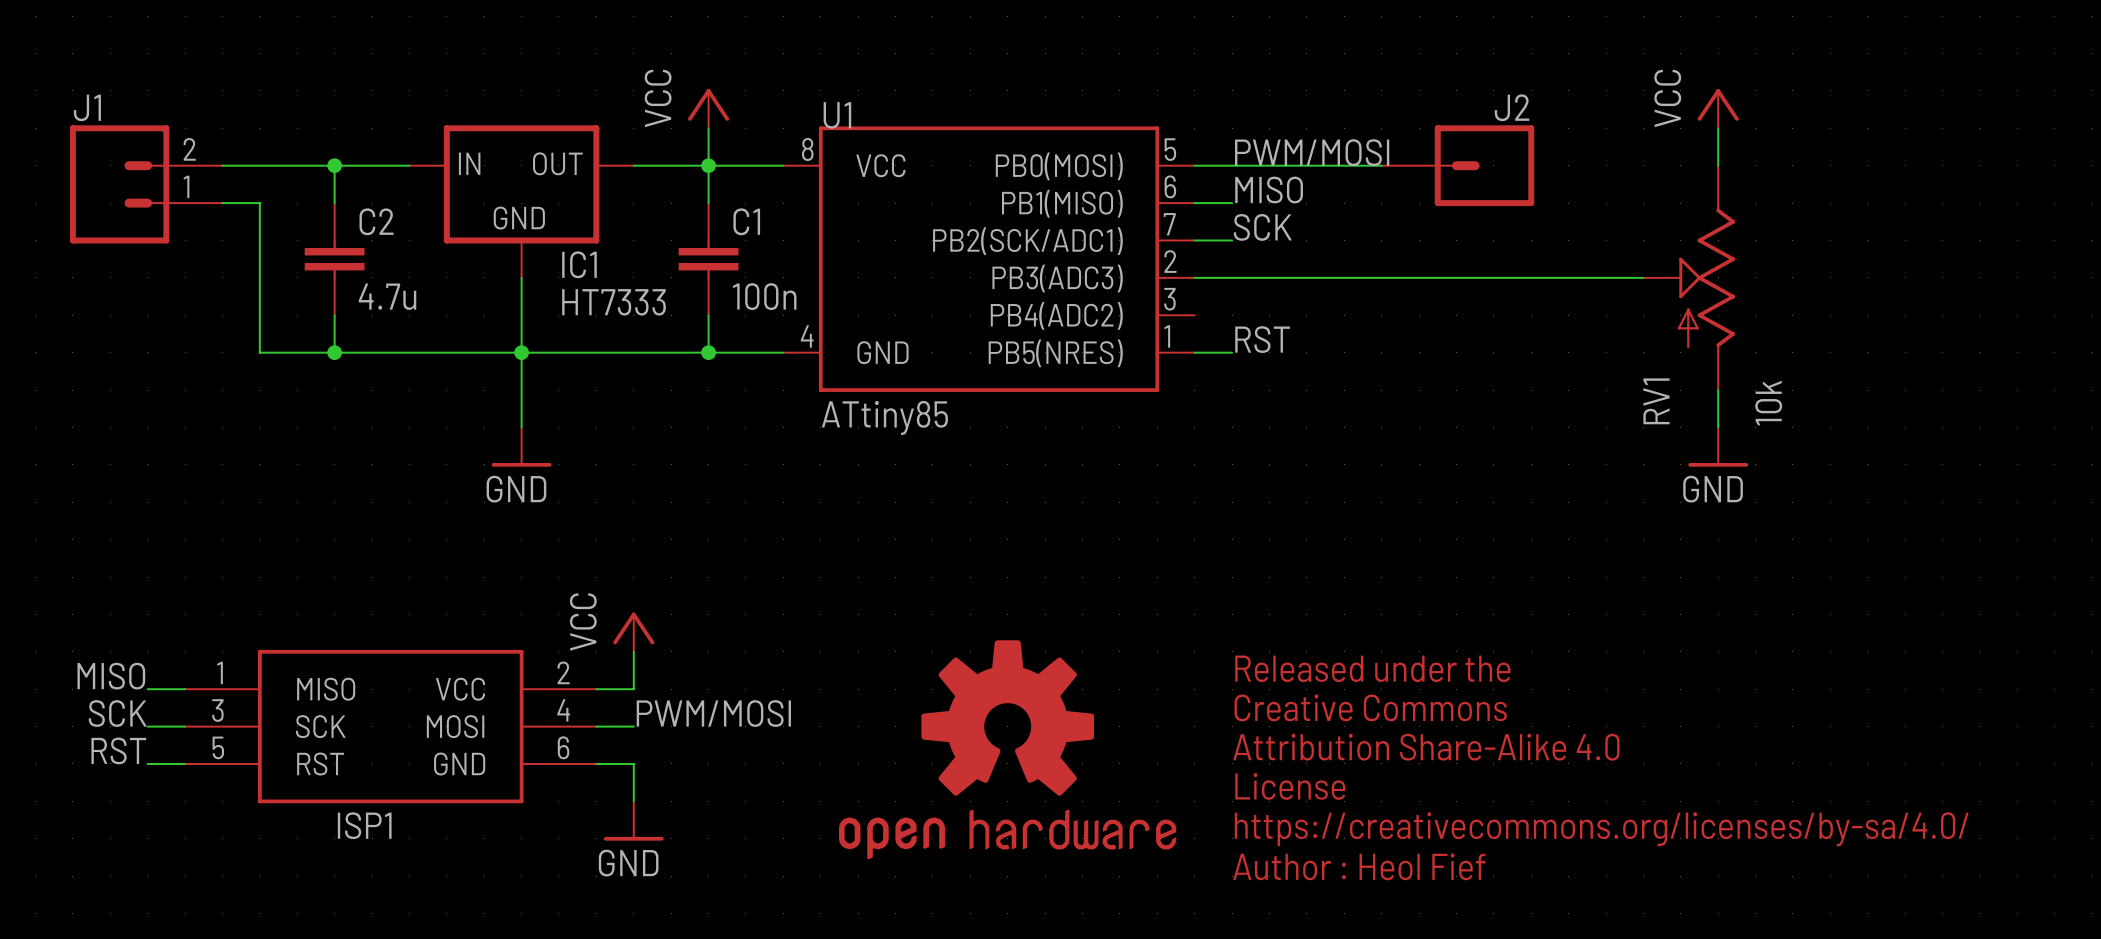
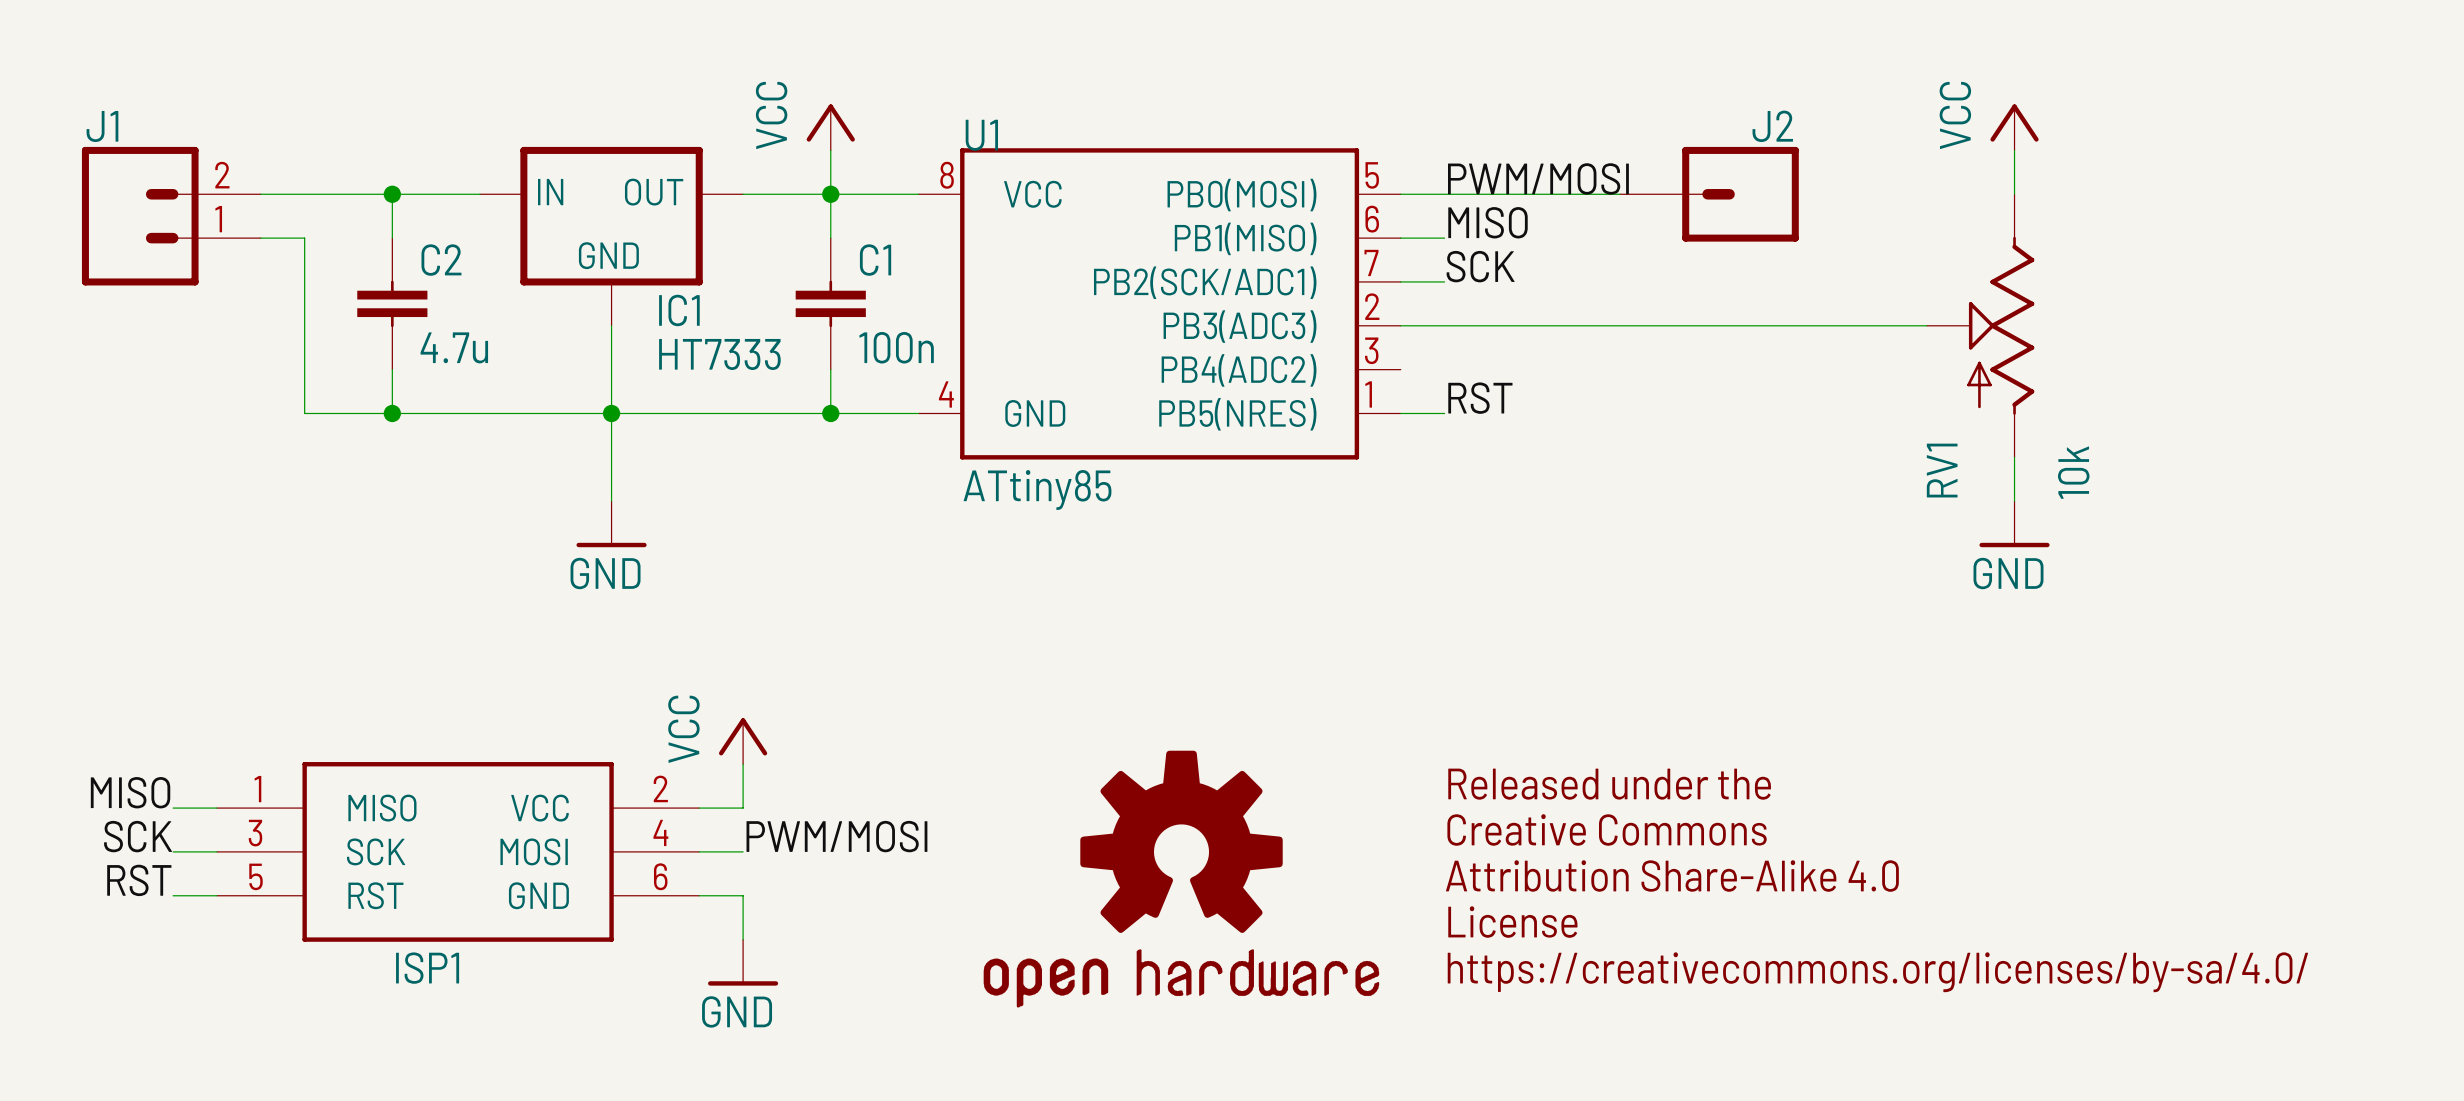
text: Author : Heol Fief (1359, 866) -> none

